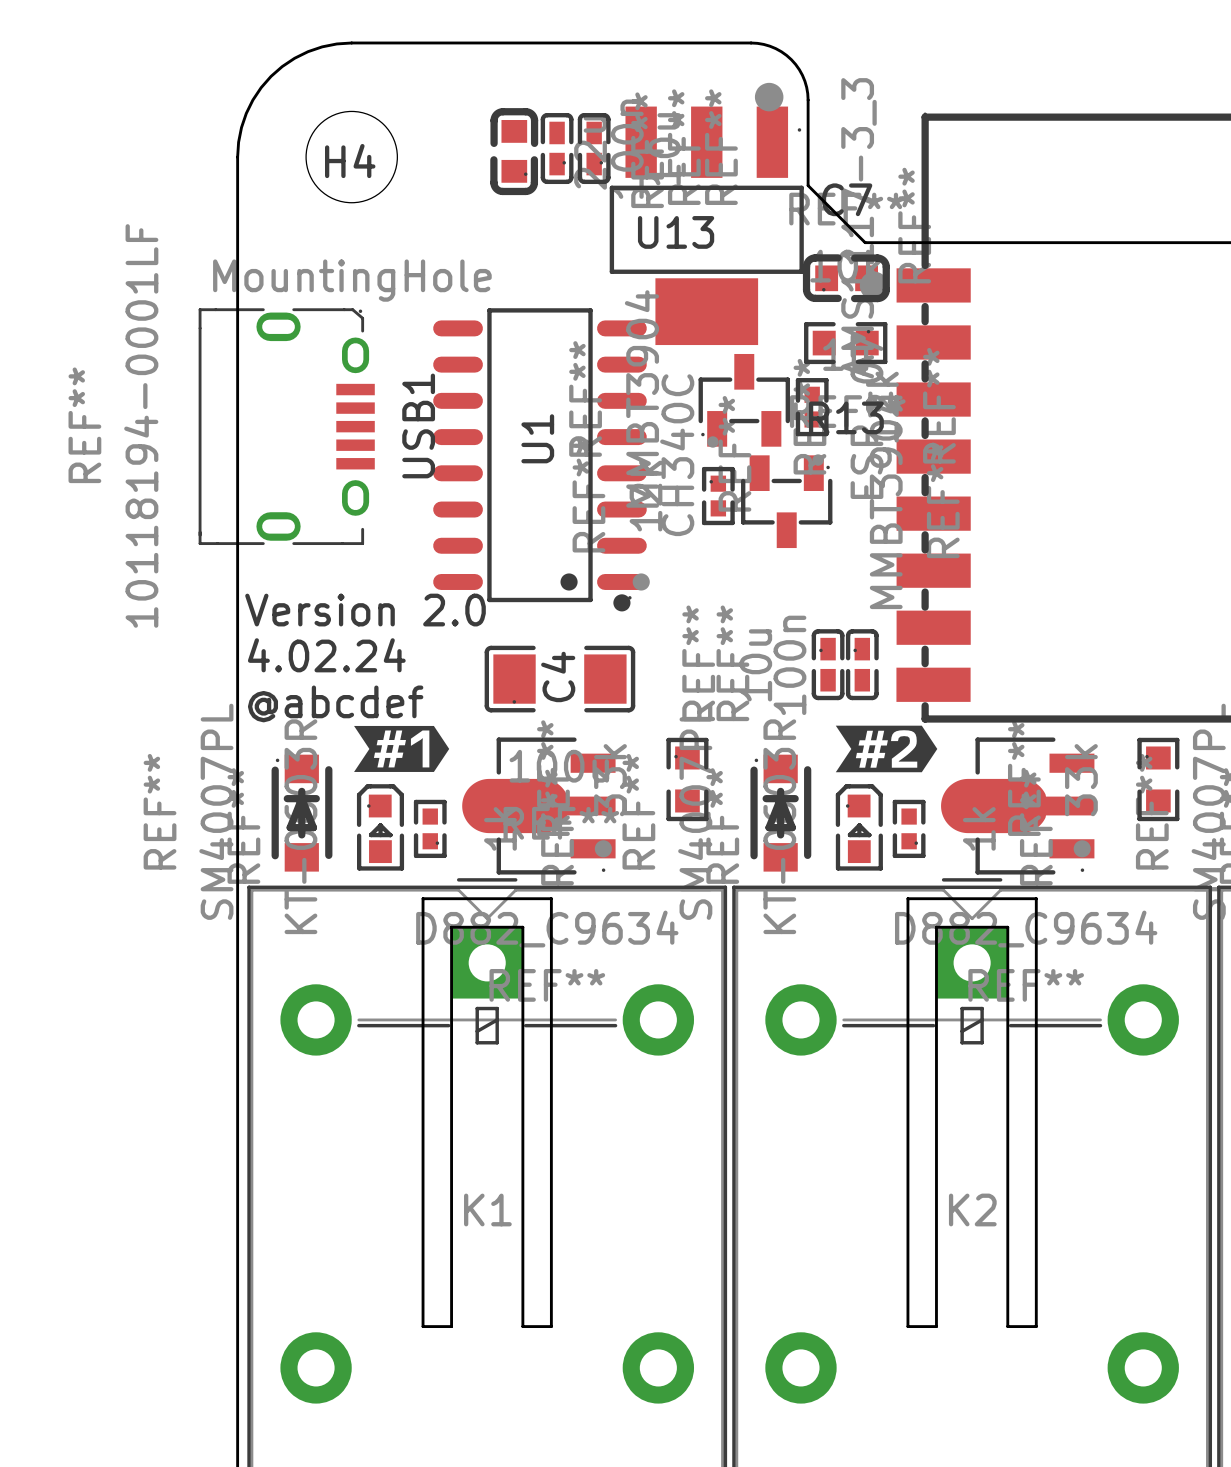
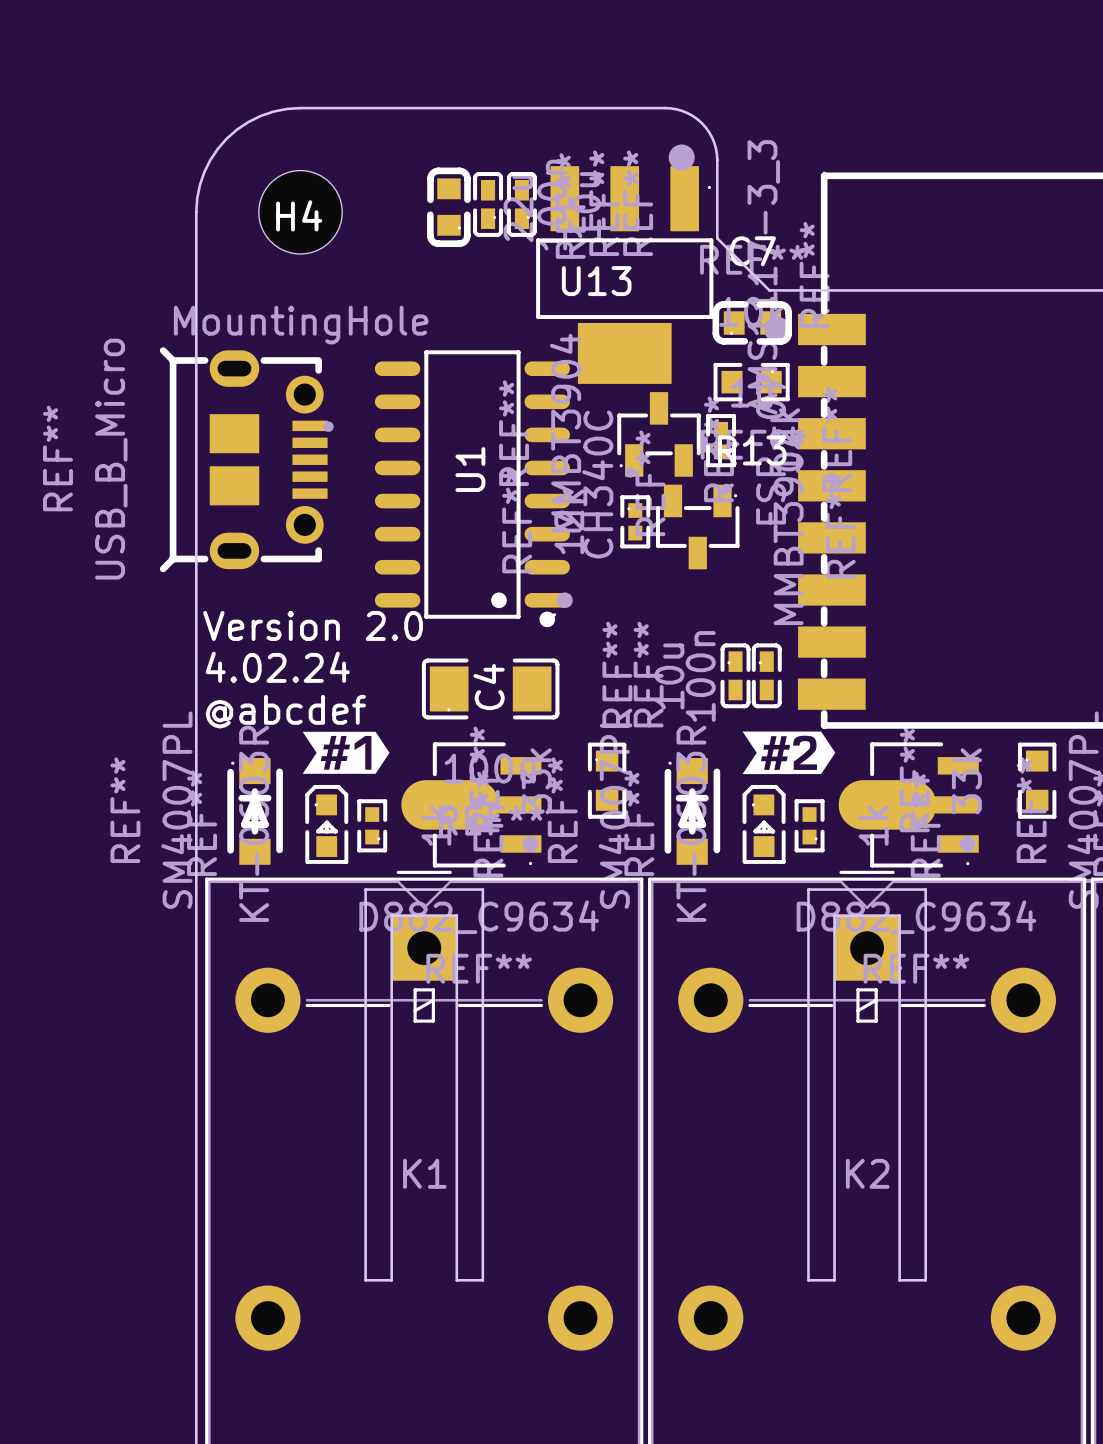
USB1: 10118194-0001LF (286, 426) -> none
part: none -> USB_B_Micro (246, 459)

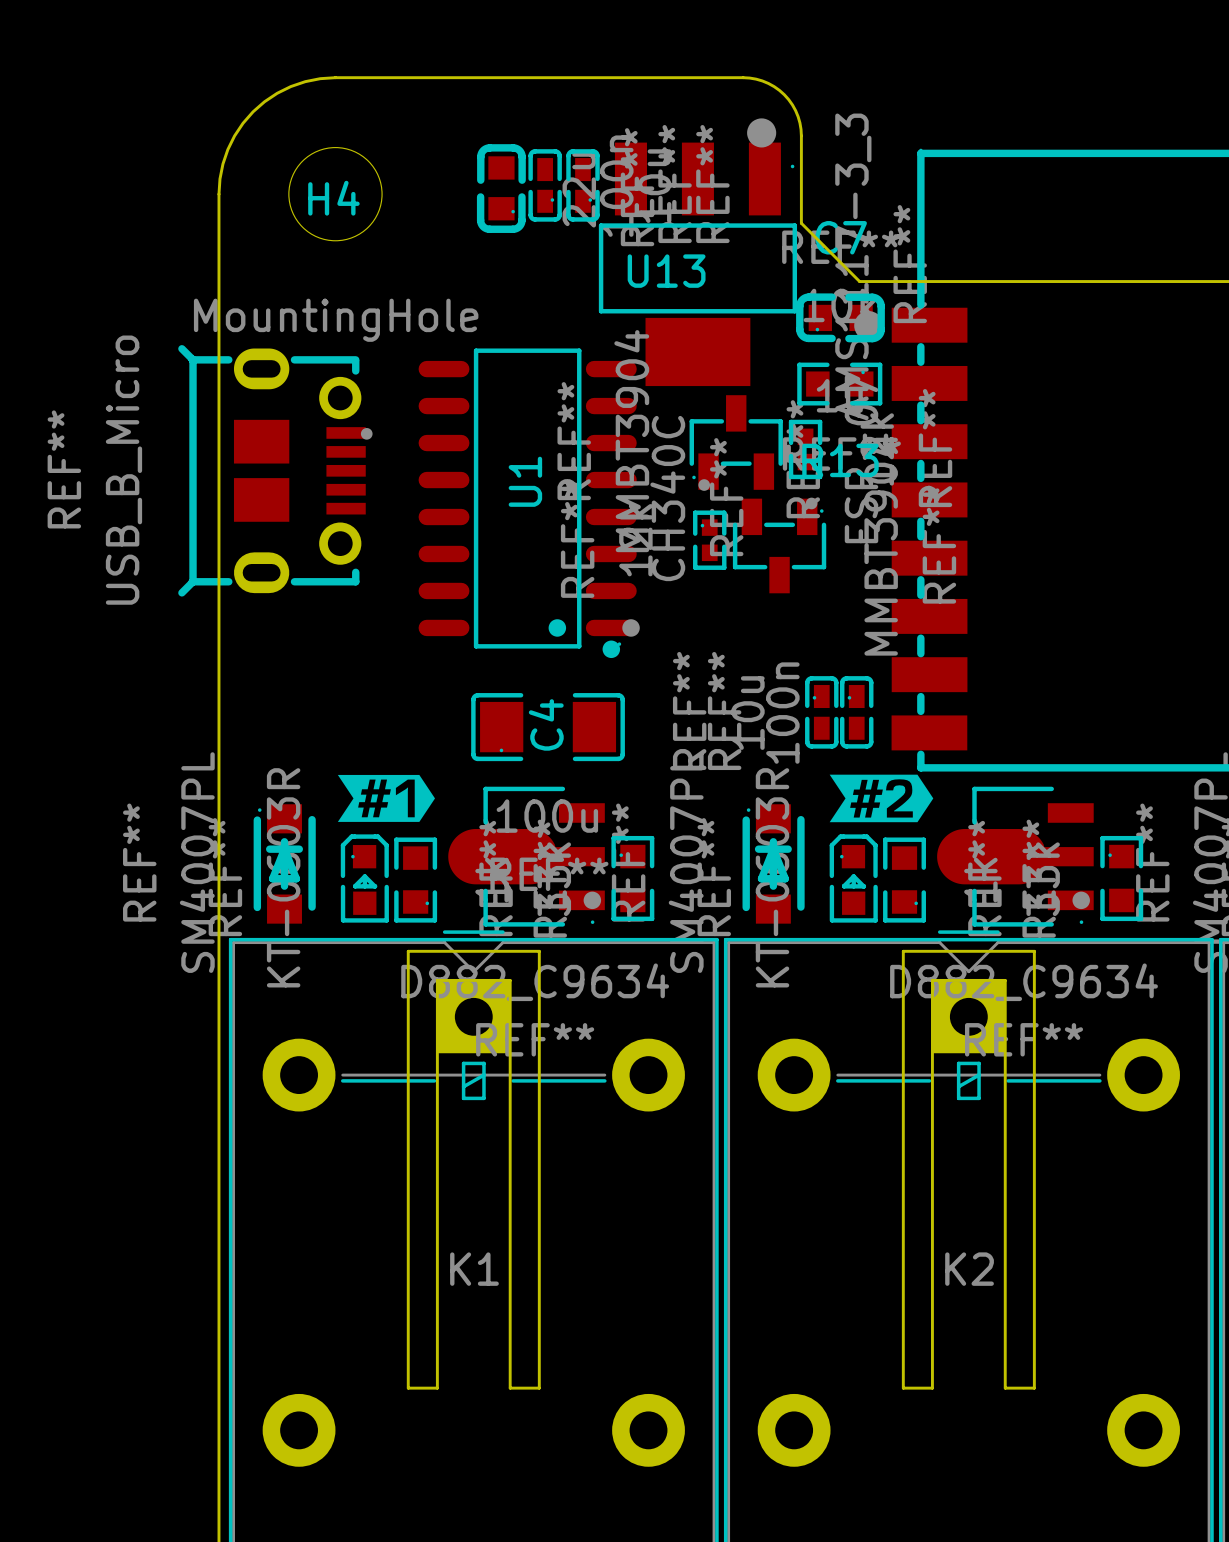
text: Version 2.0 (313, 625) -> none
text: 4.02.24 (277, 667) -> none
text: @abcdef (285, 711) -> none
part position: (607, 780) -> (632, 878)
part position: (1037, 780) -> (1121, 878)
part footprint: [357, 799, 388, 853] -> [394, 837, 438, 923]
part footprint: [794, 799, 825, 853] -> [883, 837, 926, 923]

